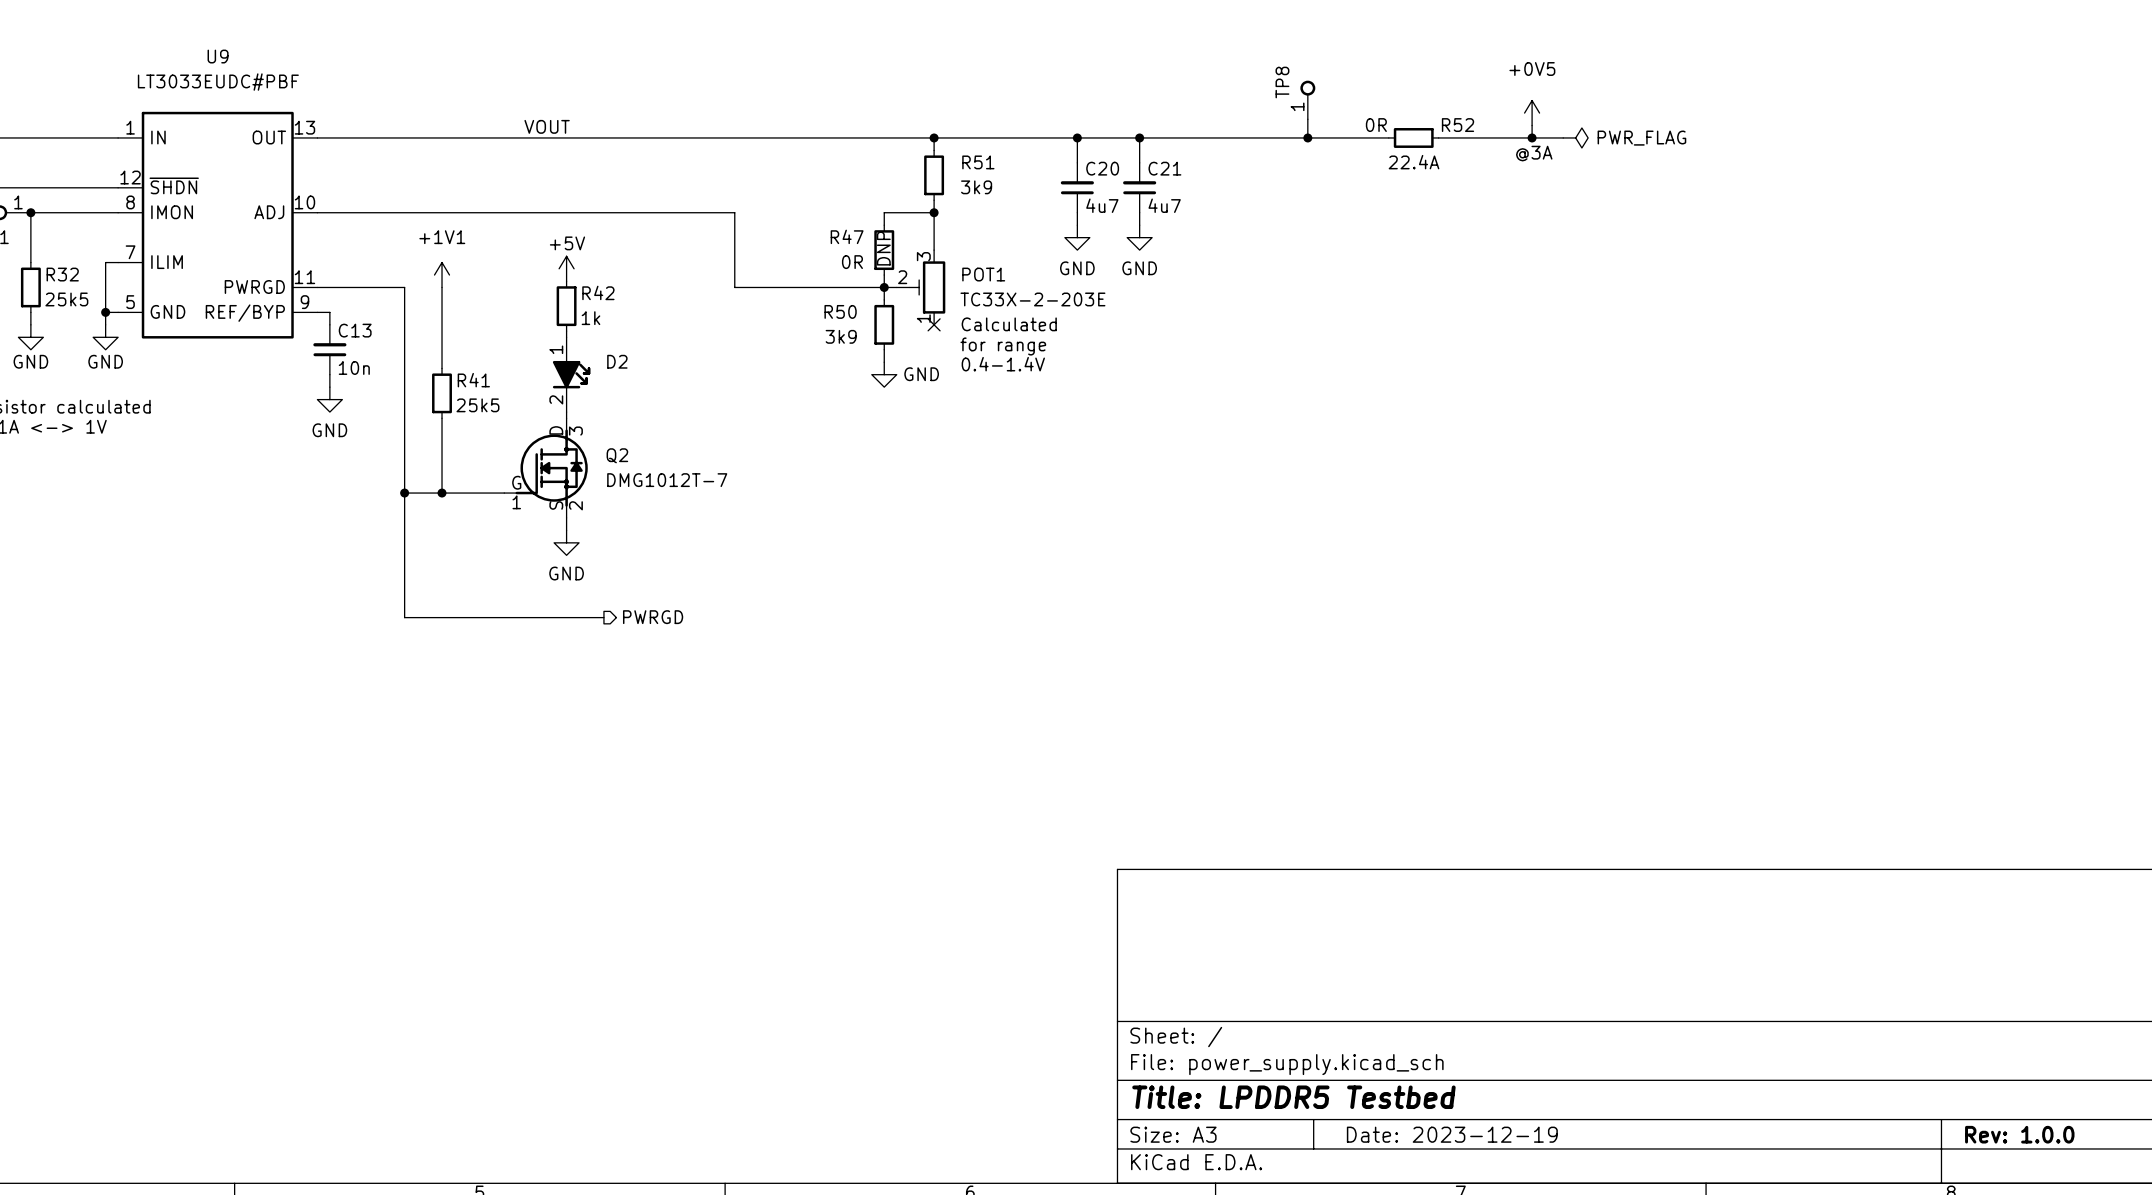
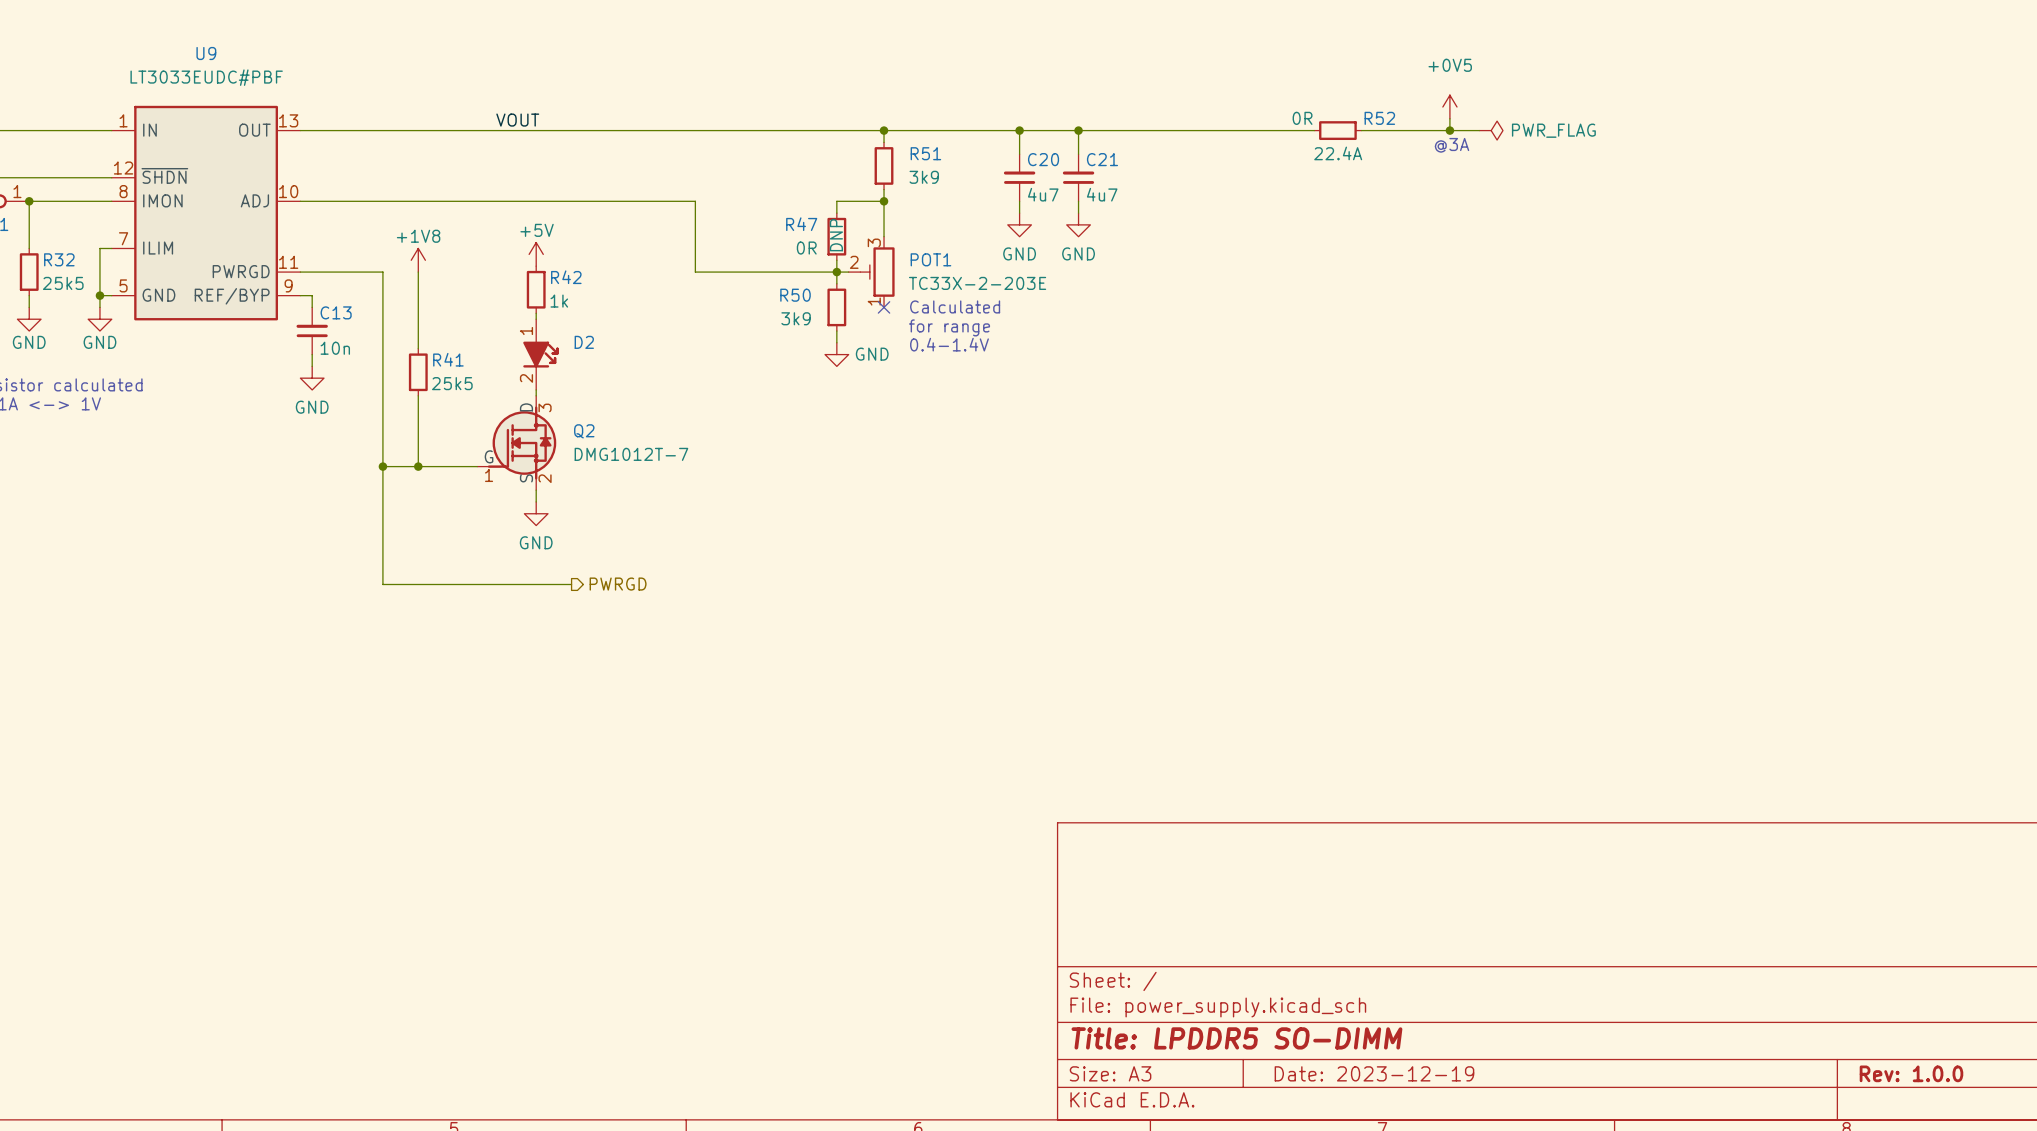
TP8: (1307, 99) -> none
wire: (1307, 119) (1307, 137) -> none
junction: (1307, 137) -> none
power symbol: +1V1 (442, 275) -> +1V8 (418, 260)
title block: Title: LPDDR5 Testbed (1293, 1097) -> Title: LPDDR5 SO-DIMM (1236, 1038)

